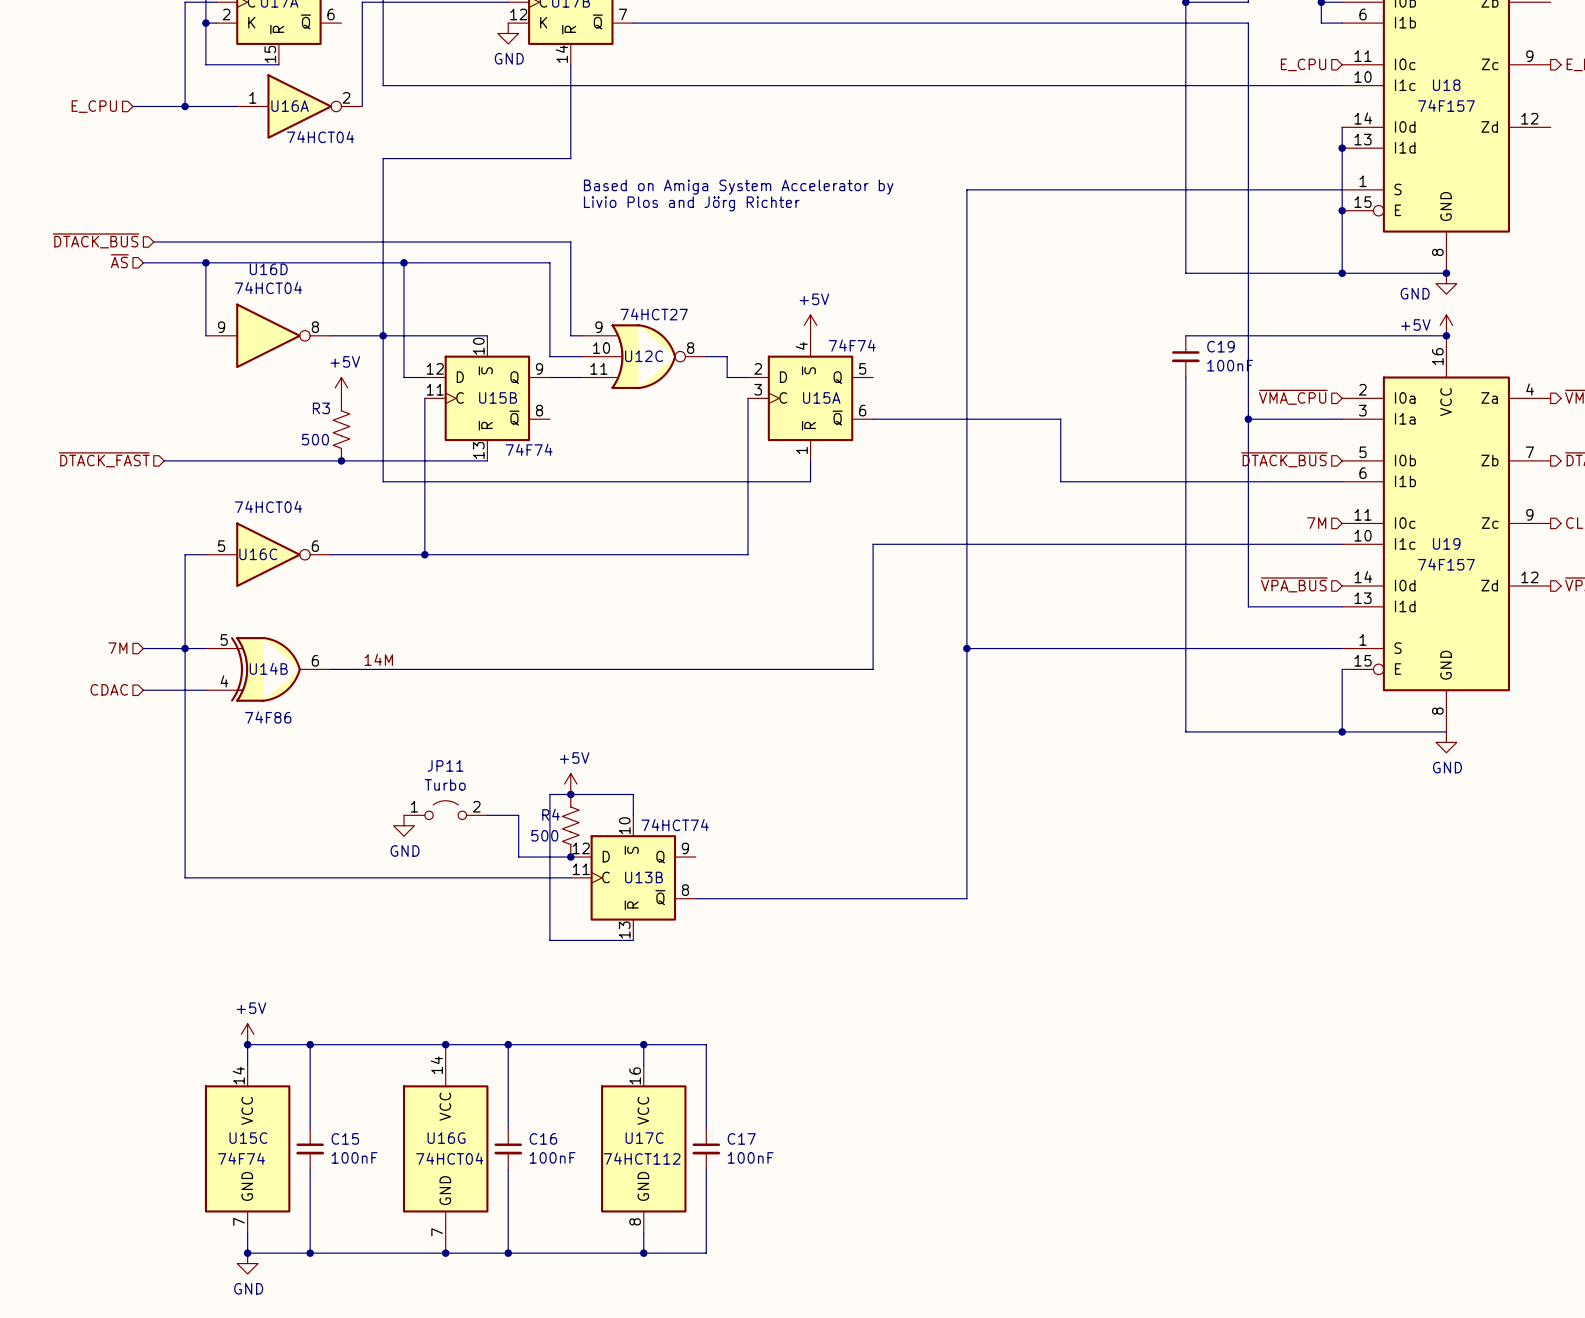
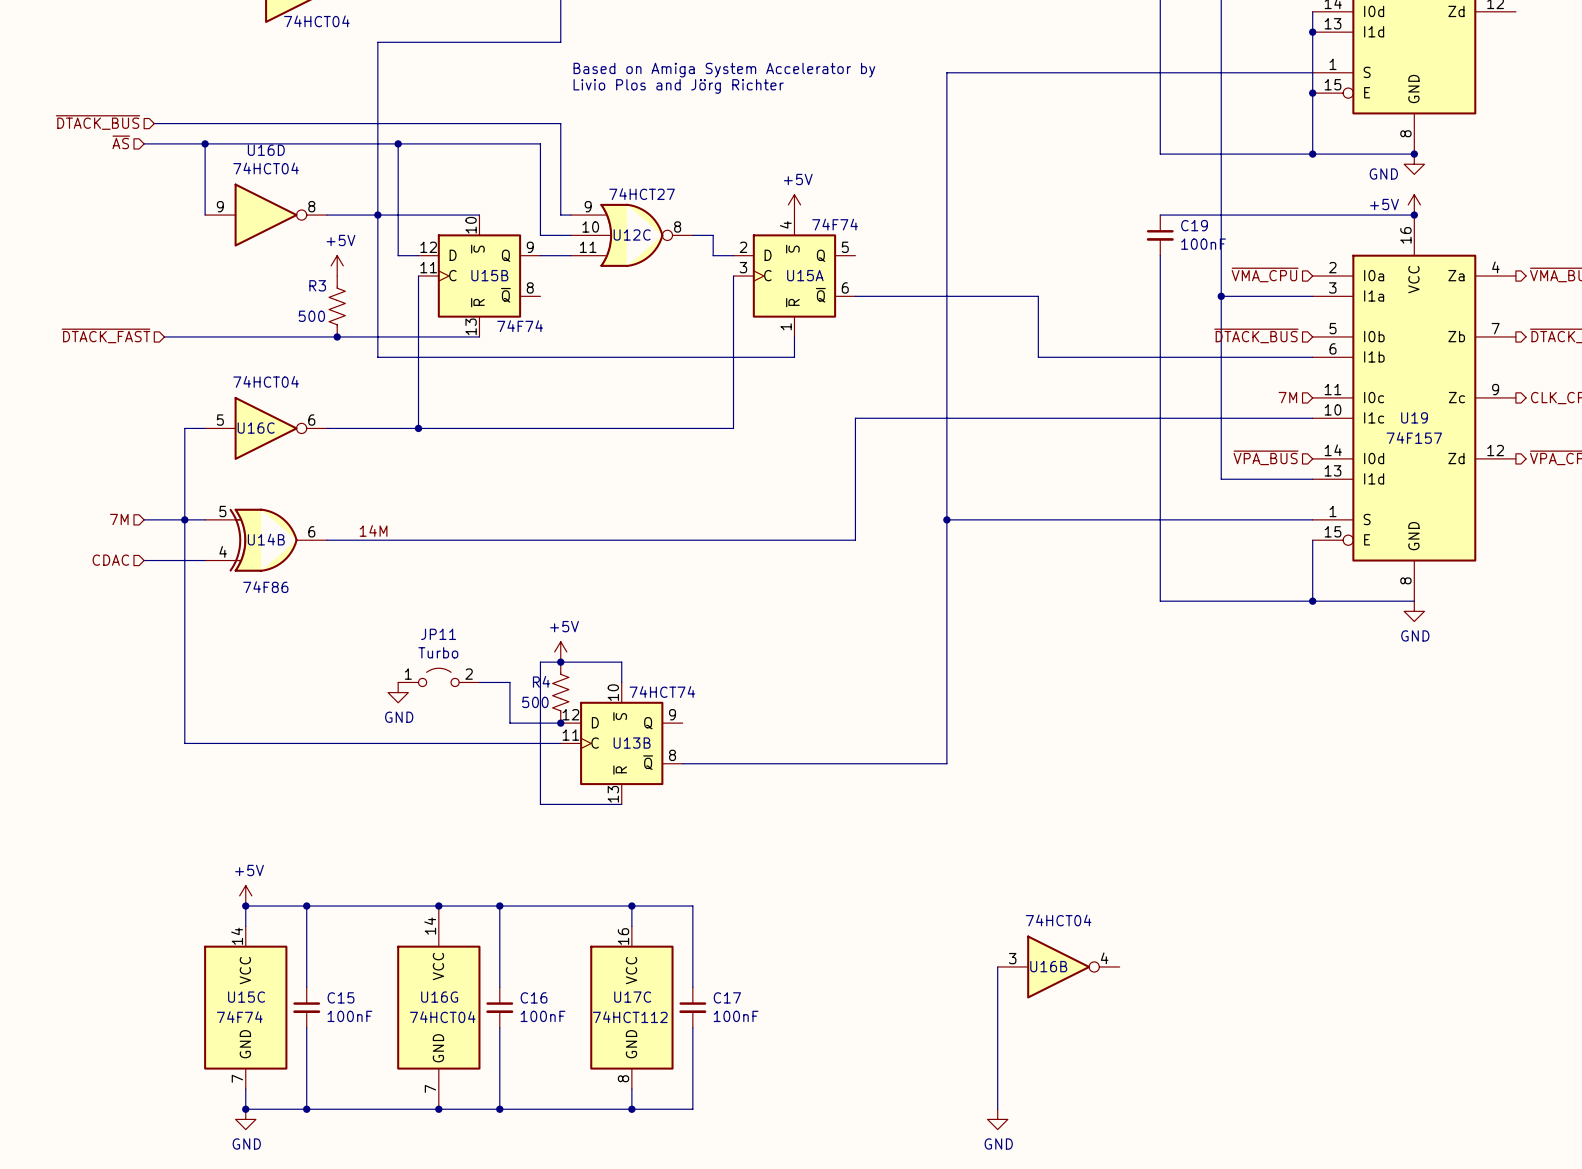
wire: none -> (997, 966) (997, 1109)
U16B: none -> 74HCT04 (1058, 966)
power symbol: none -> GND (997, 1119)

